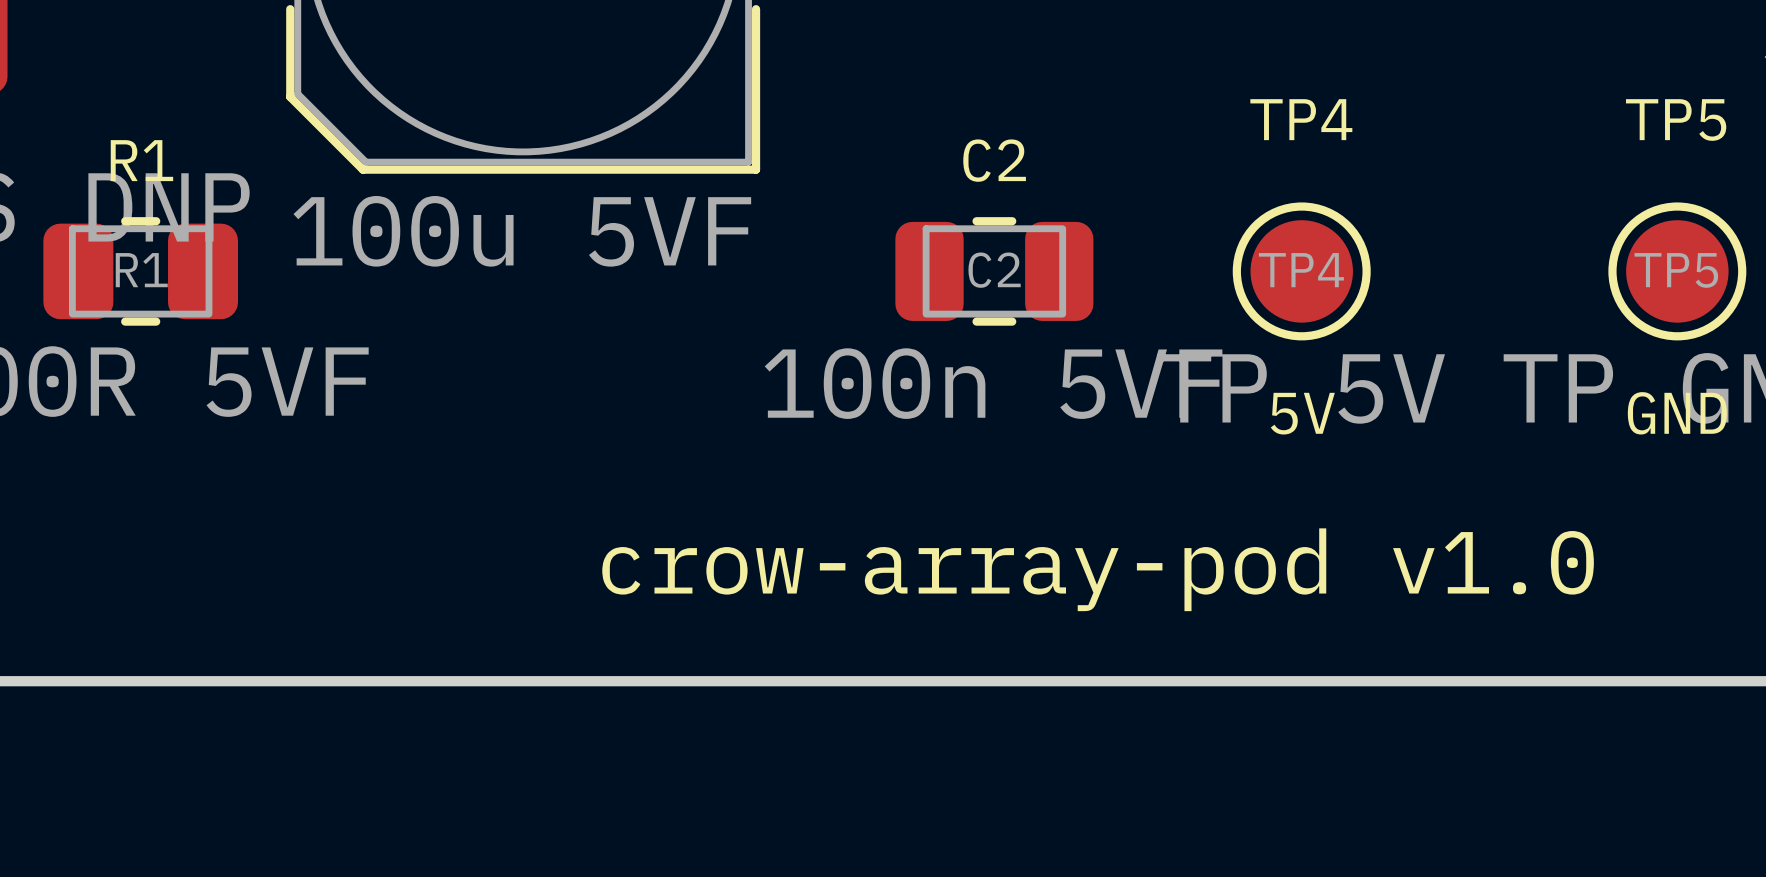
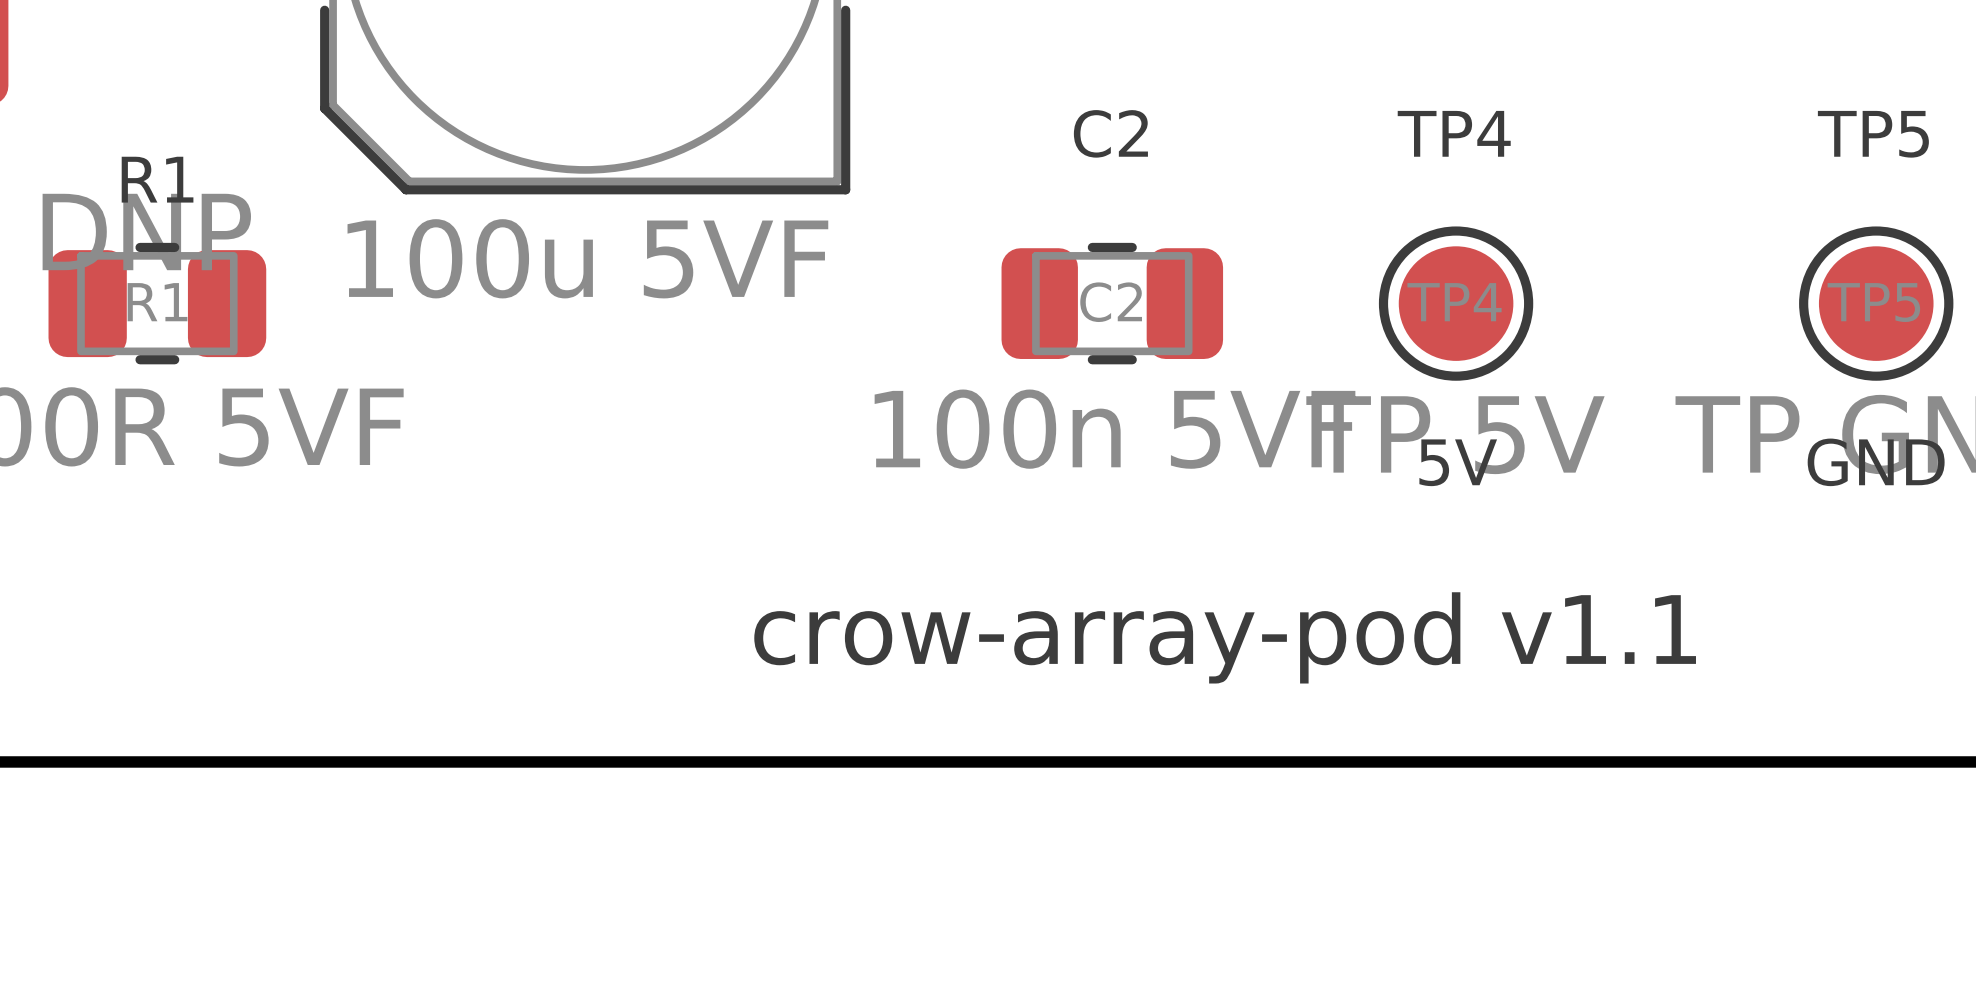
C2 name position: C2 (994, 160) -> C2 (1110, 133)
text: crow-array-pod v1.0 (1098, 569) -> crow-array-pod v1.1 (1225, 637)

